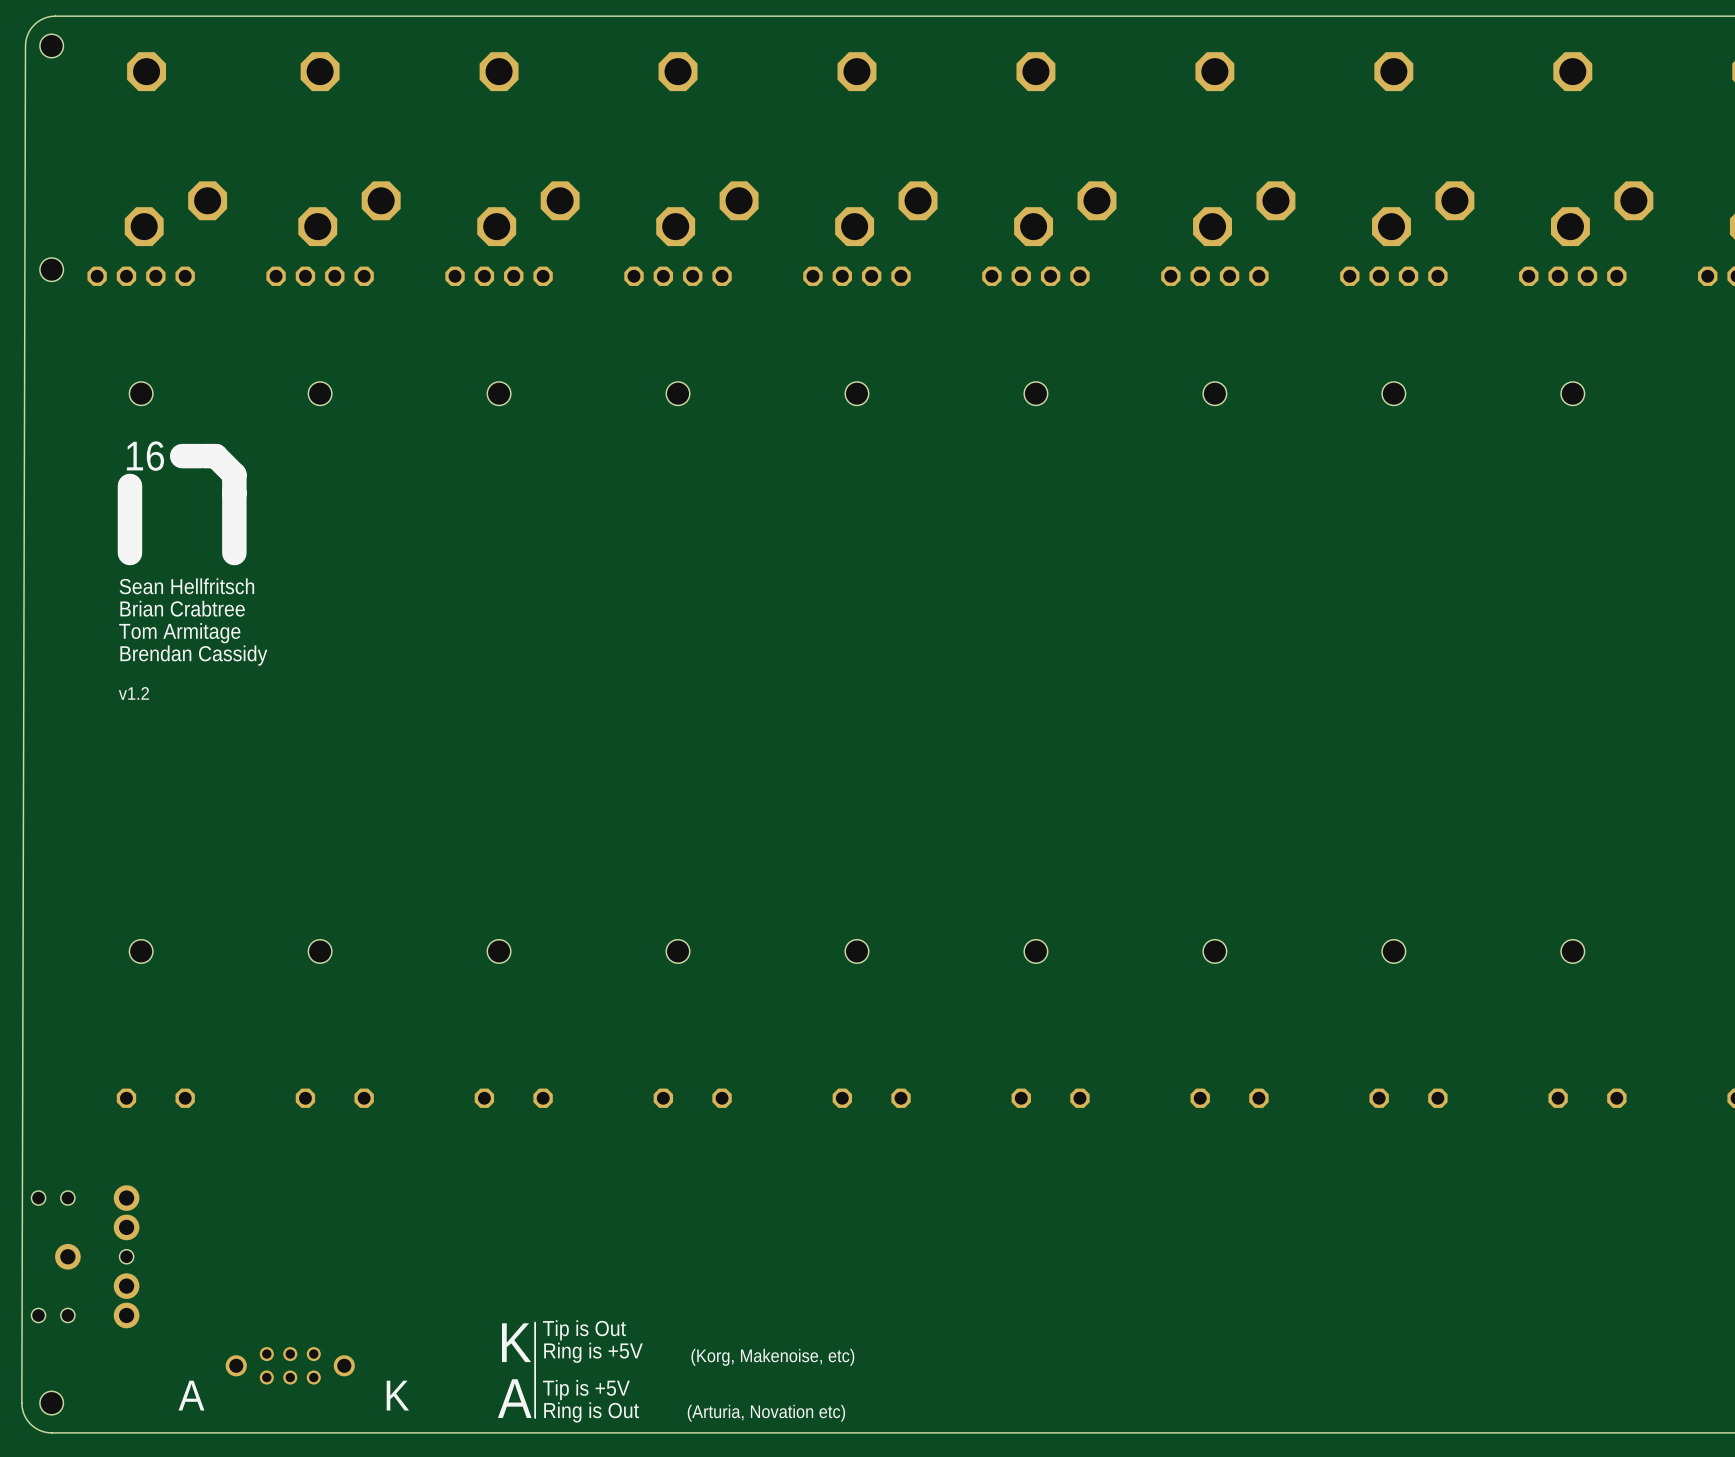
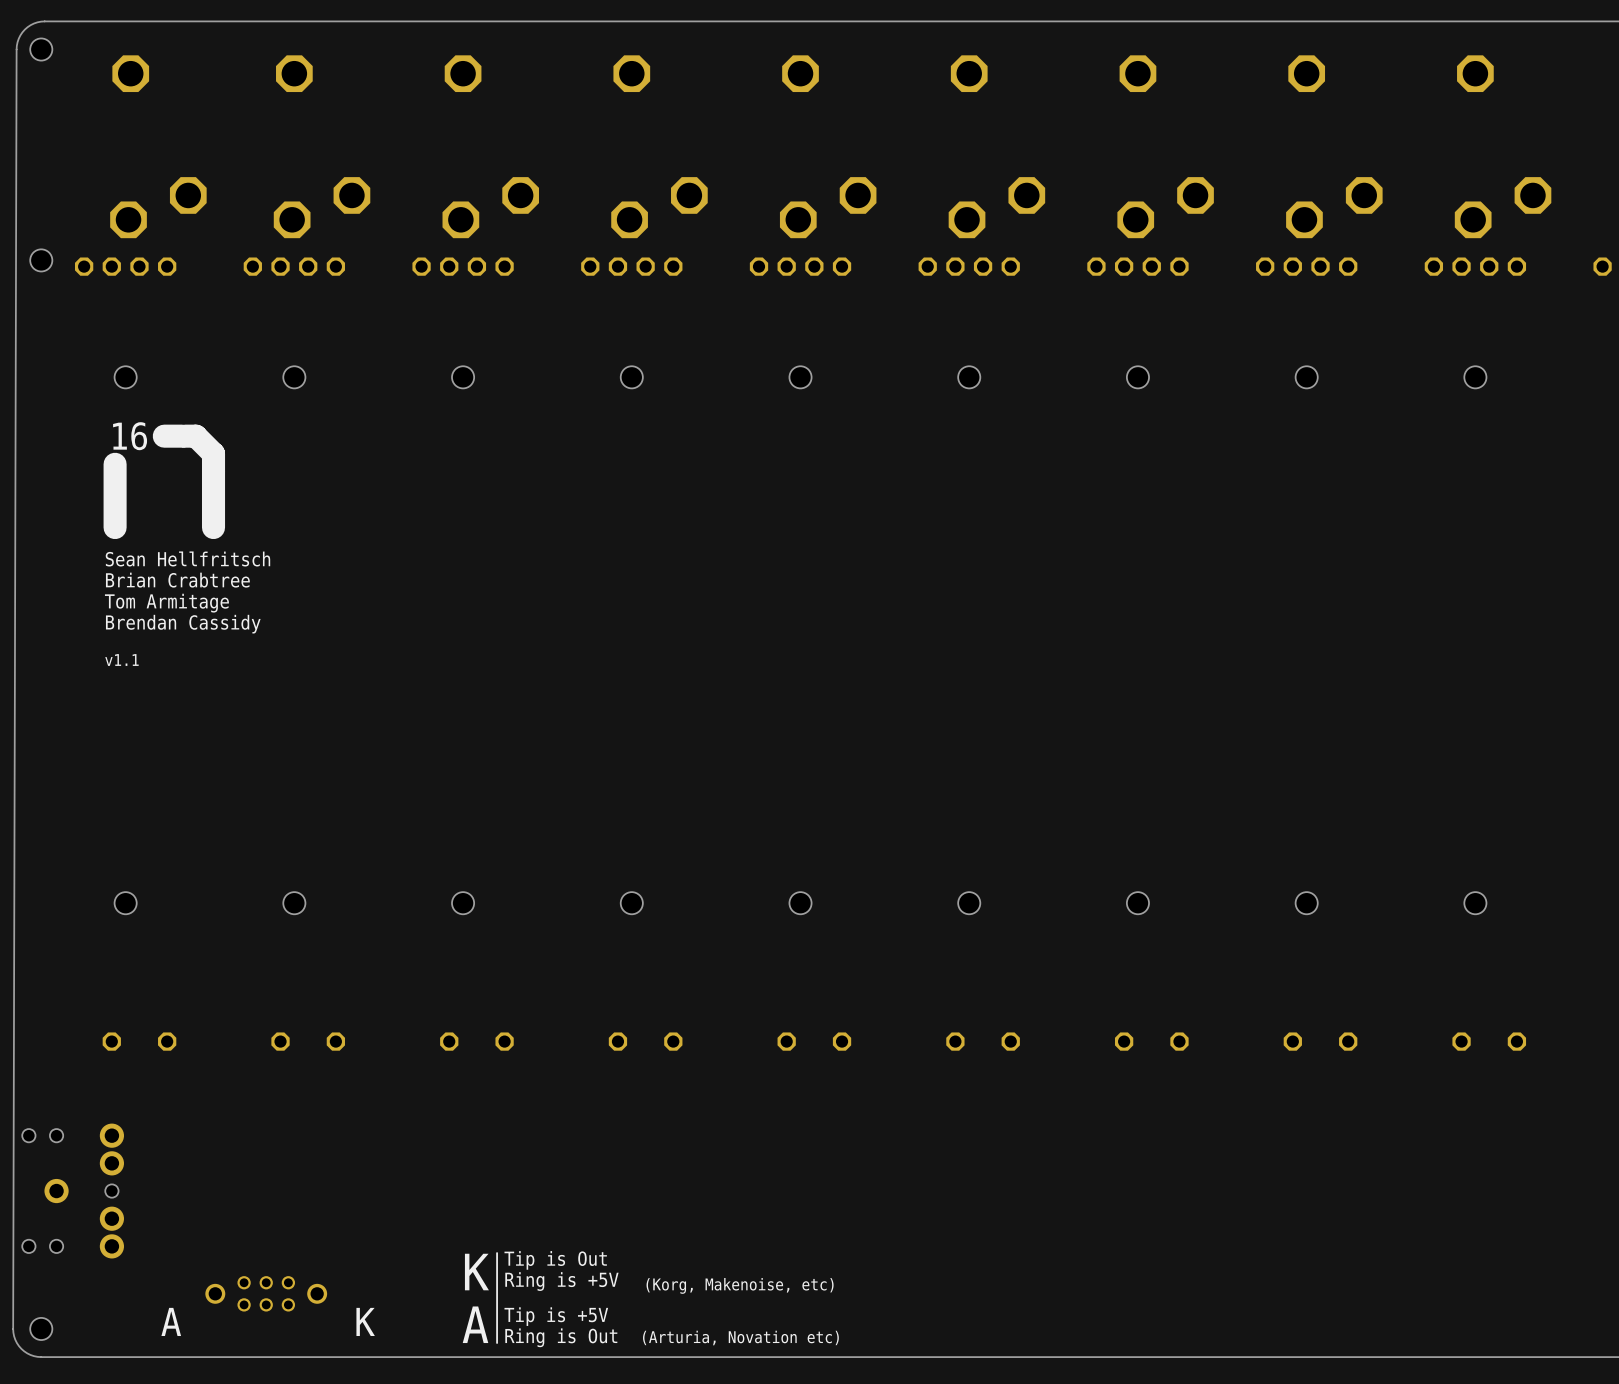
text: v1.2 (133, 693) -> v1.1 (121, 660)

